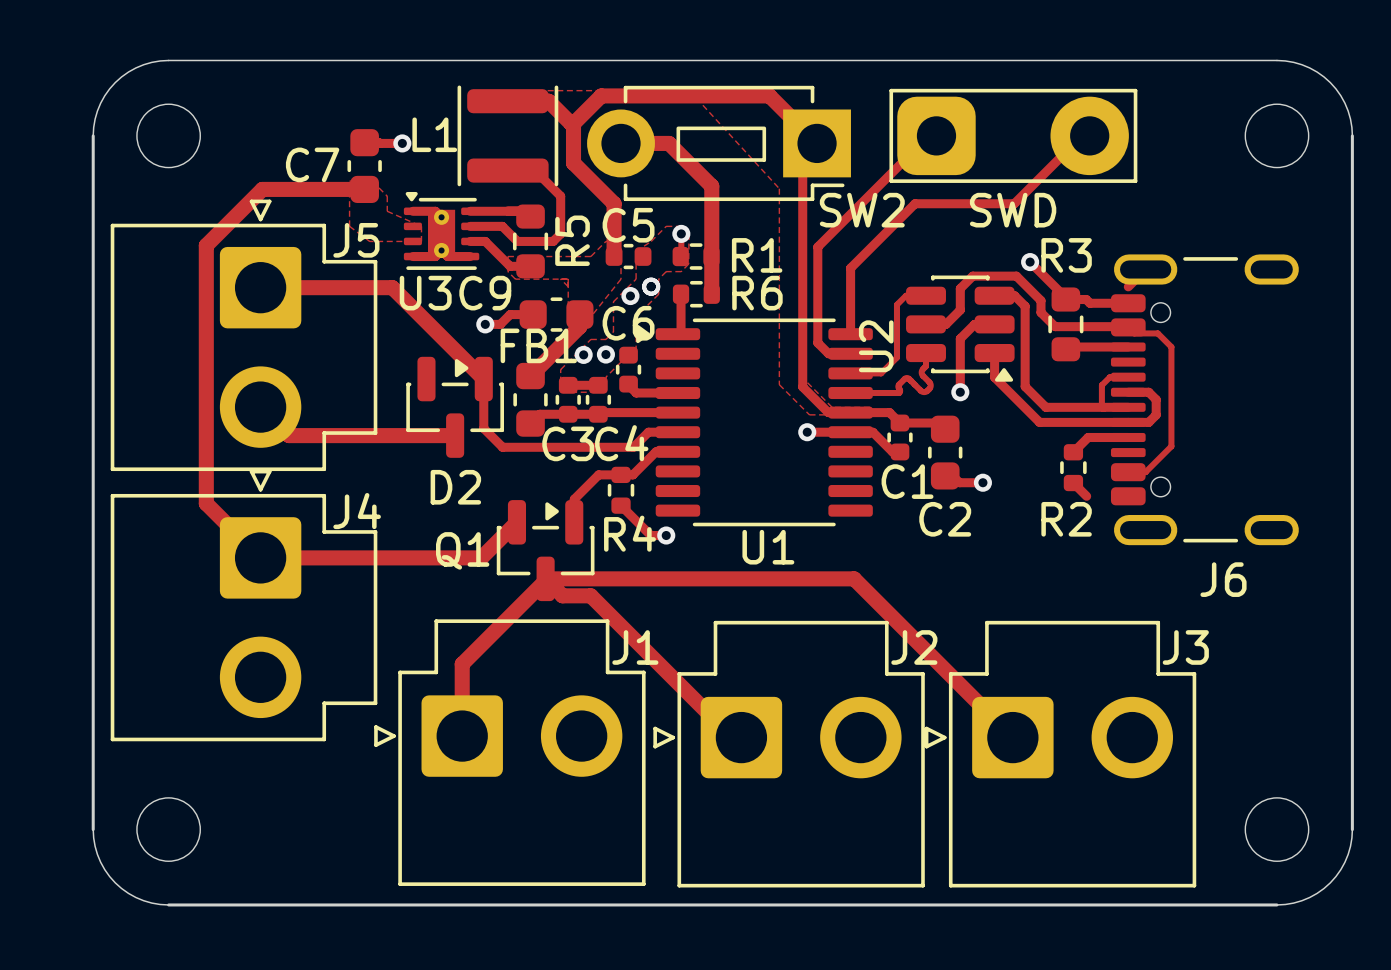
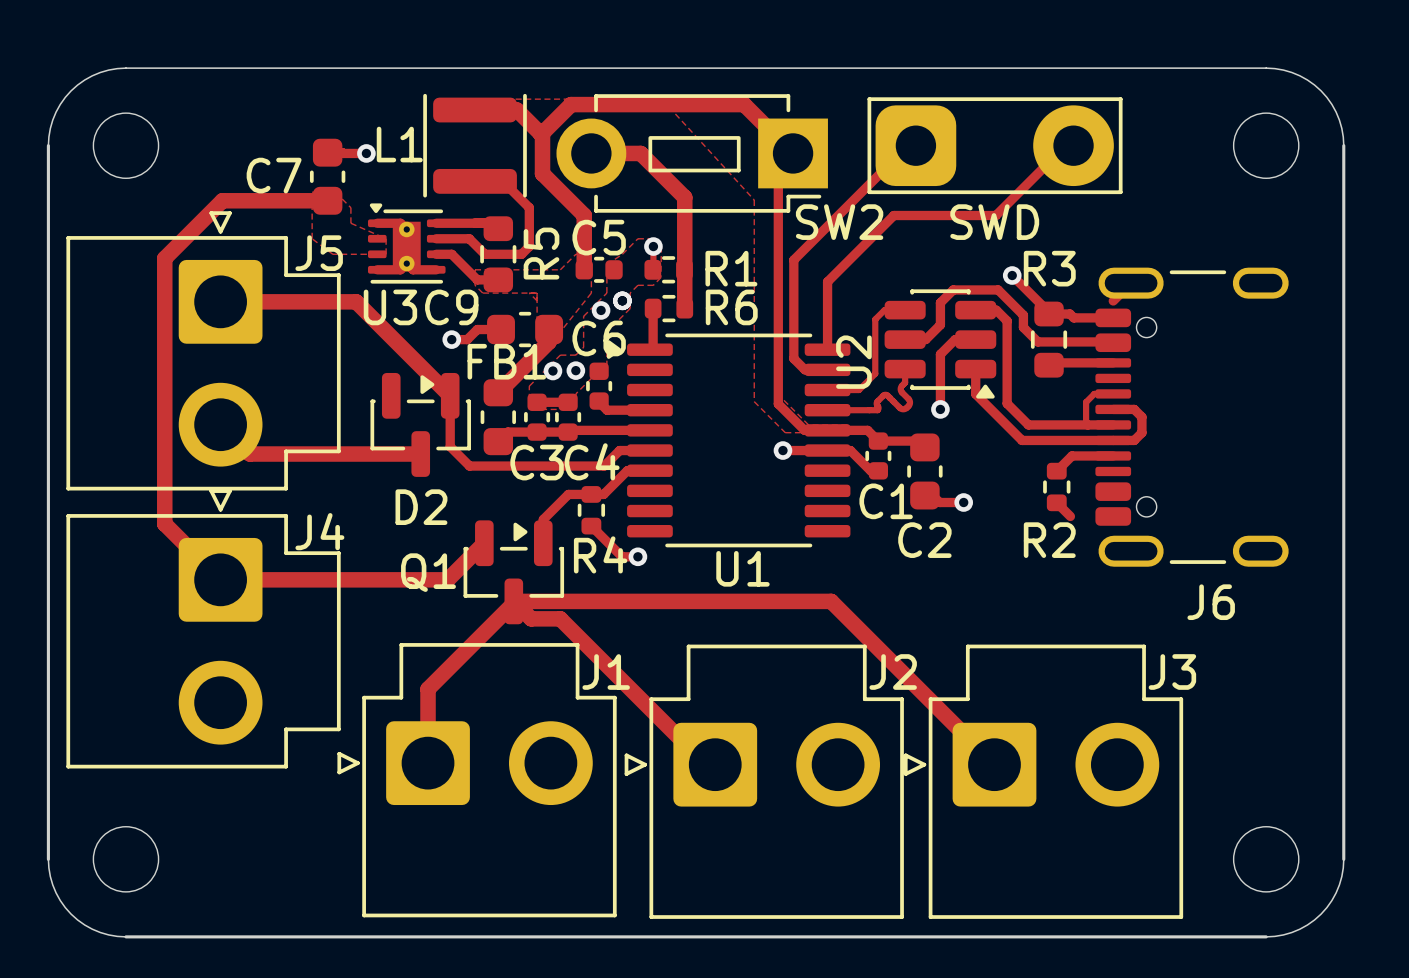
track: (1128, 327) (1134, 333) (1157, 333) (1171, 347) (1171, 446) (1145, 472) (1128, 472) -> none

